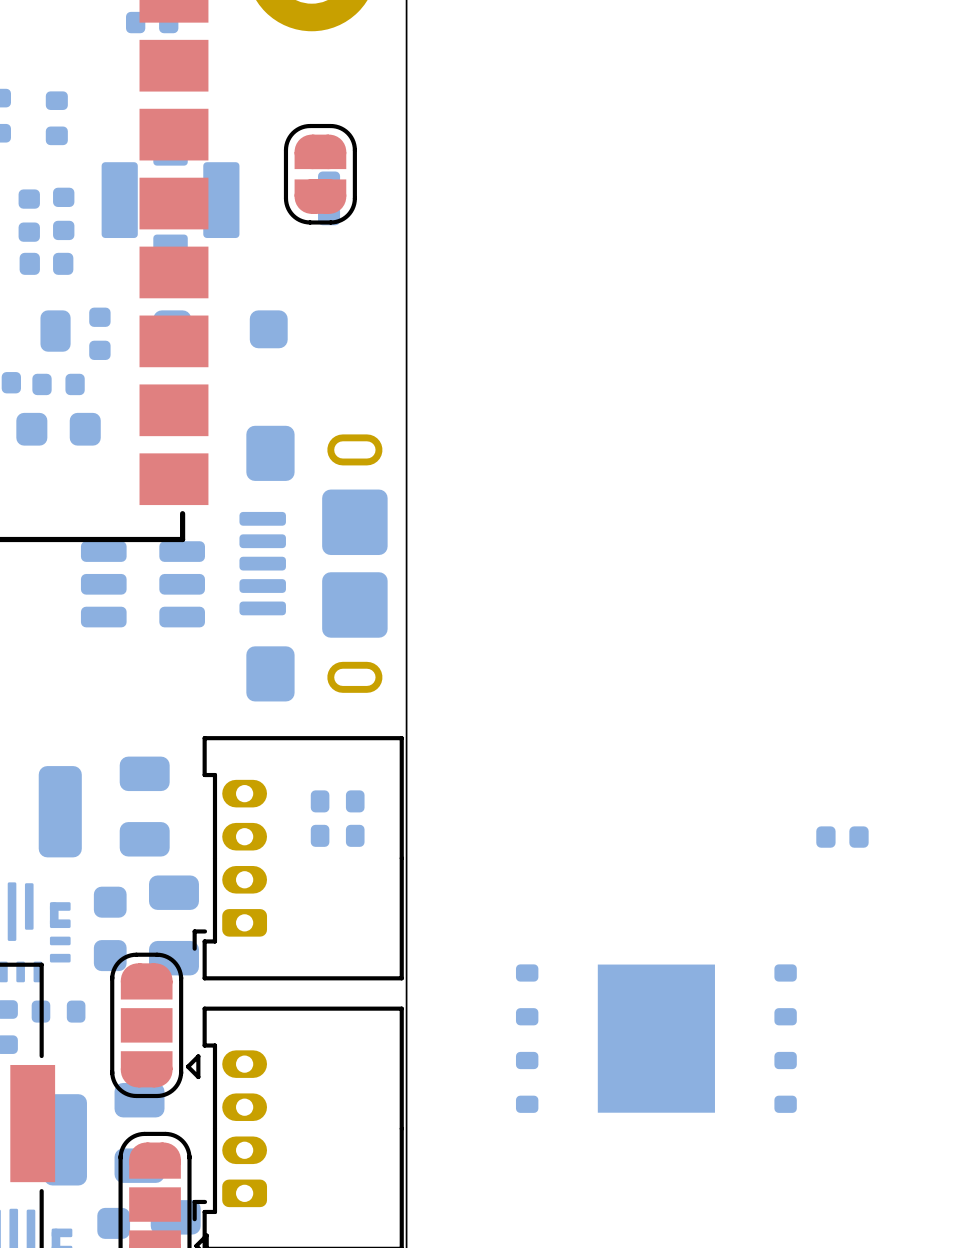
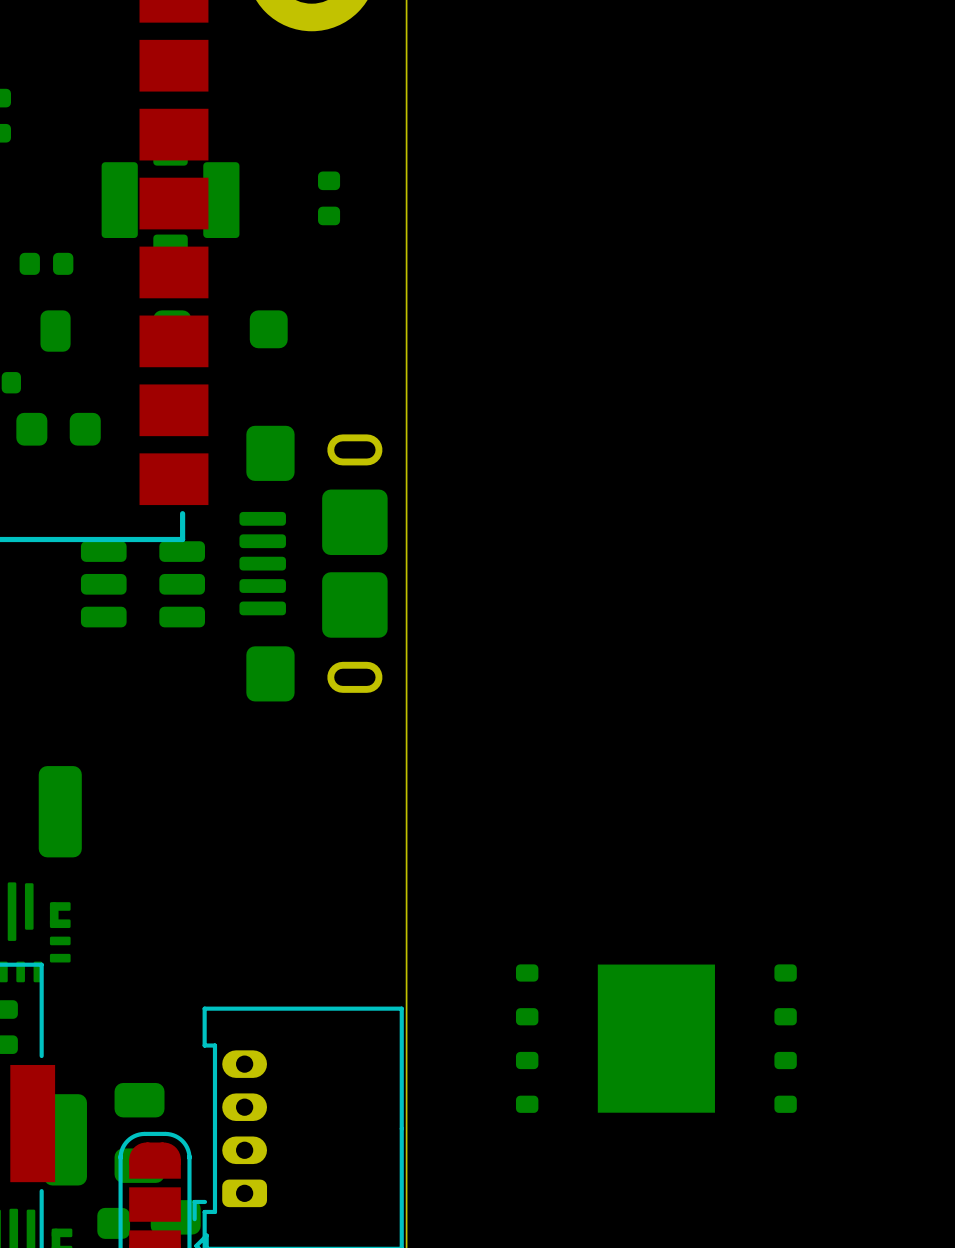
part: (152, 22) -> none
part: (56, 118) -> none
part: (320, 174) -> none
part: (63, 213) -> none
part: (29, 215) -> none
part: (99, 333) -> none
part: (58, 384) -> none
part: (337, 801) -> none
part: (144, 806) -> none
part: (337, 835) -> none
part: (842, 837) -> none
part: (298, 858) -> none
part: (173, 925) -> none
part: (110, 928) -> none
part: (58, 1011) -> none
part: (155, 1025) -> none

